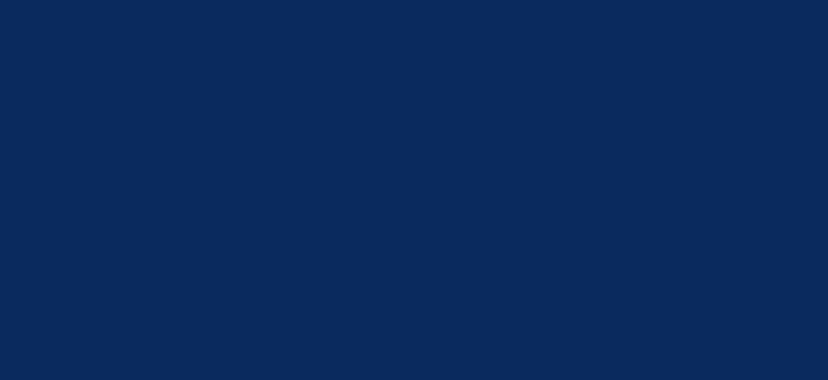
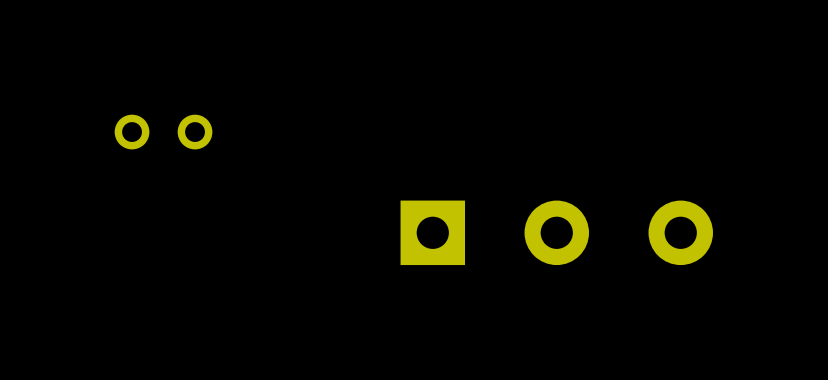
part: none -> (163, 132)
part: none -> (556, 232)

